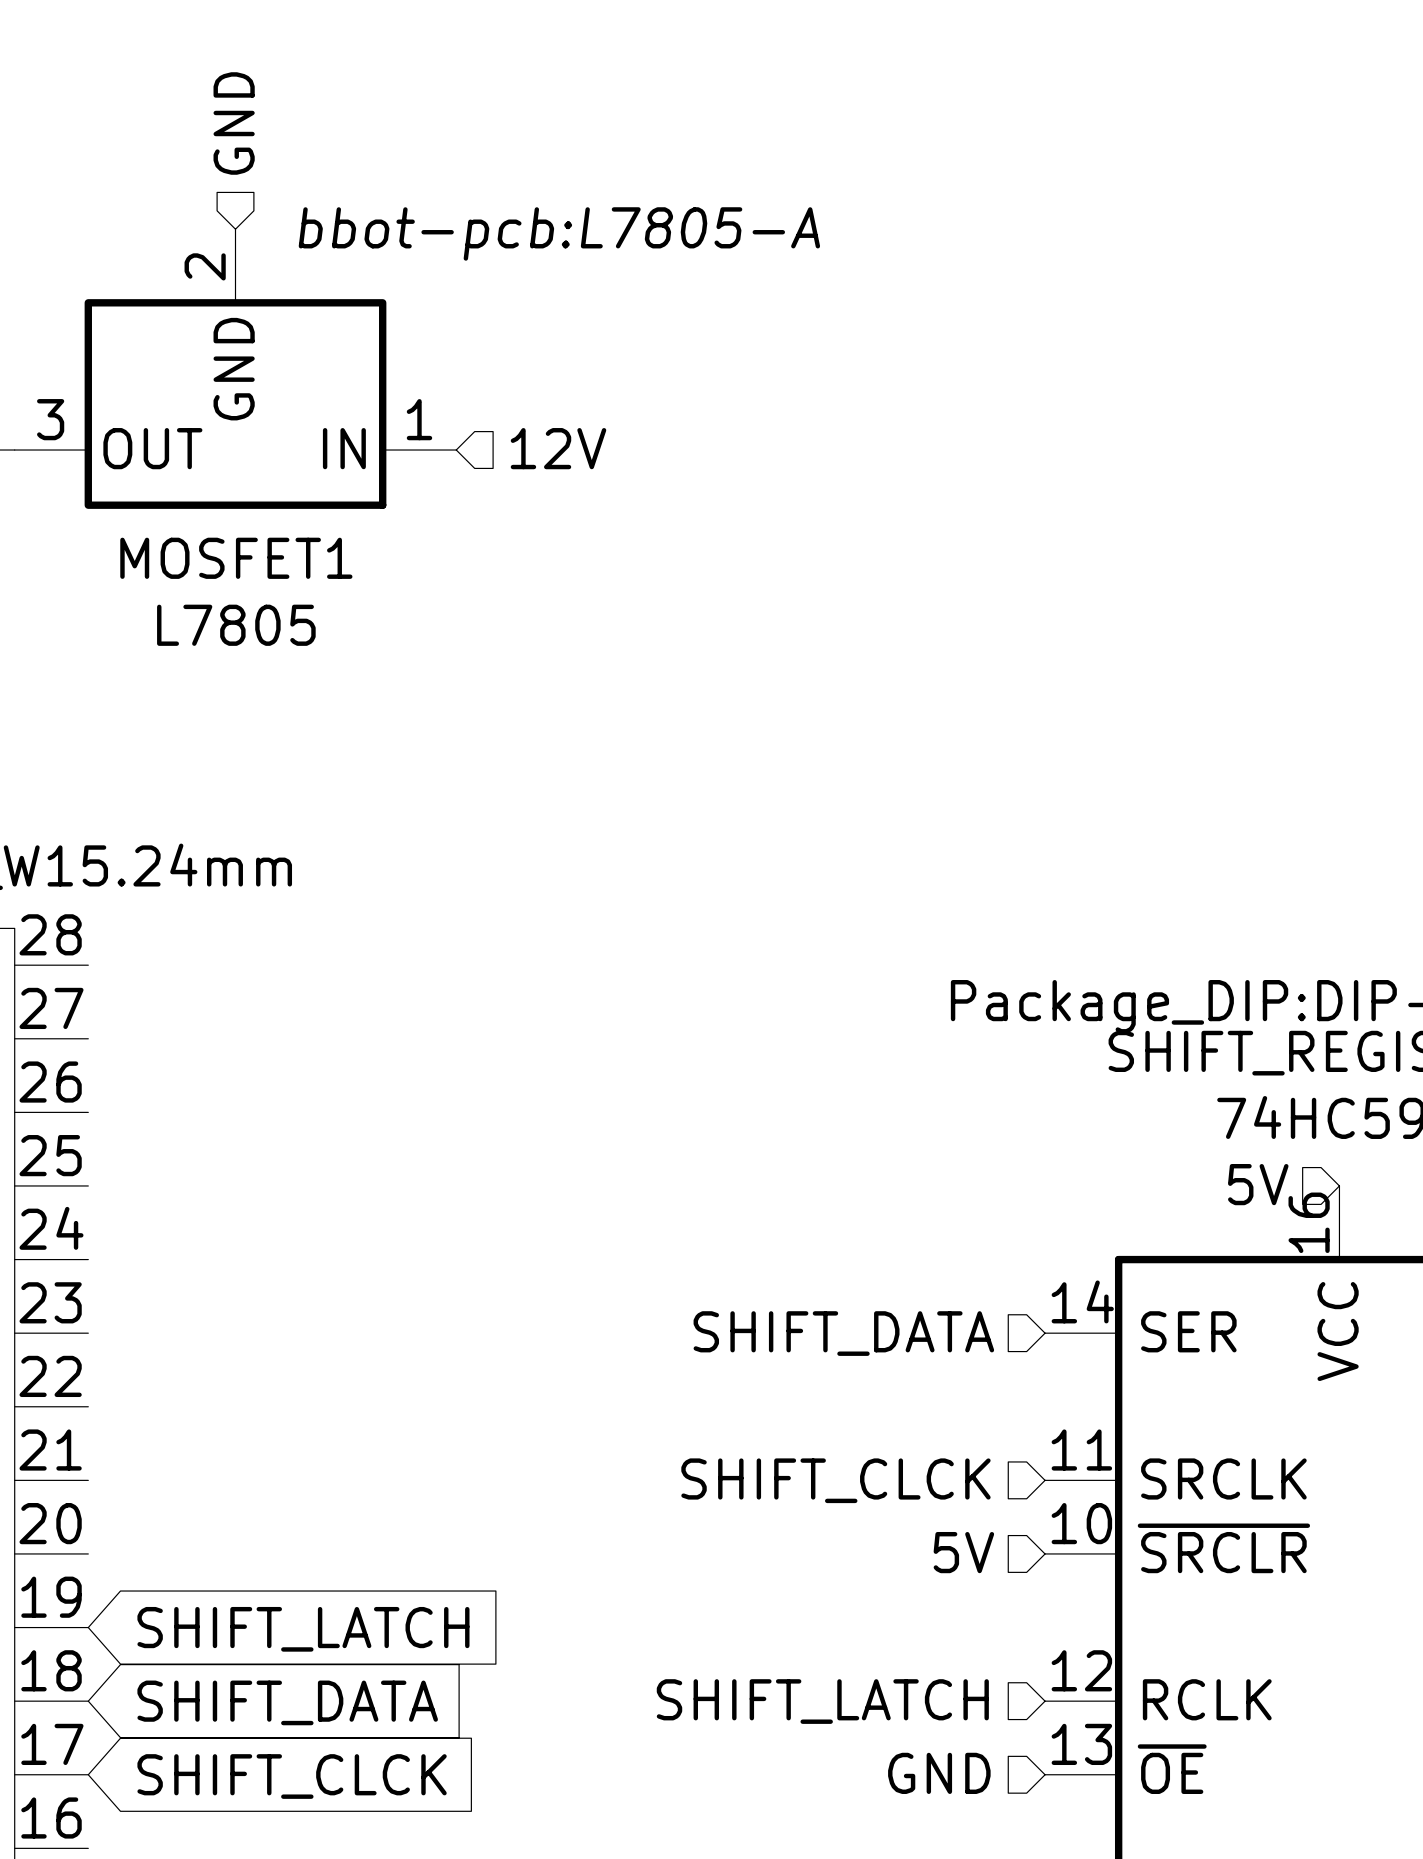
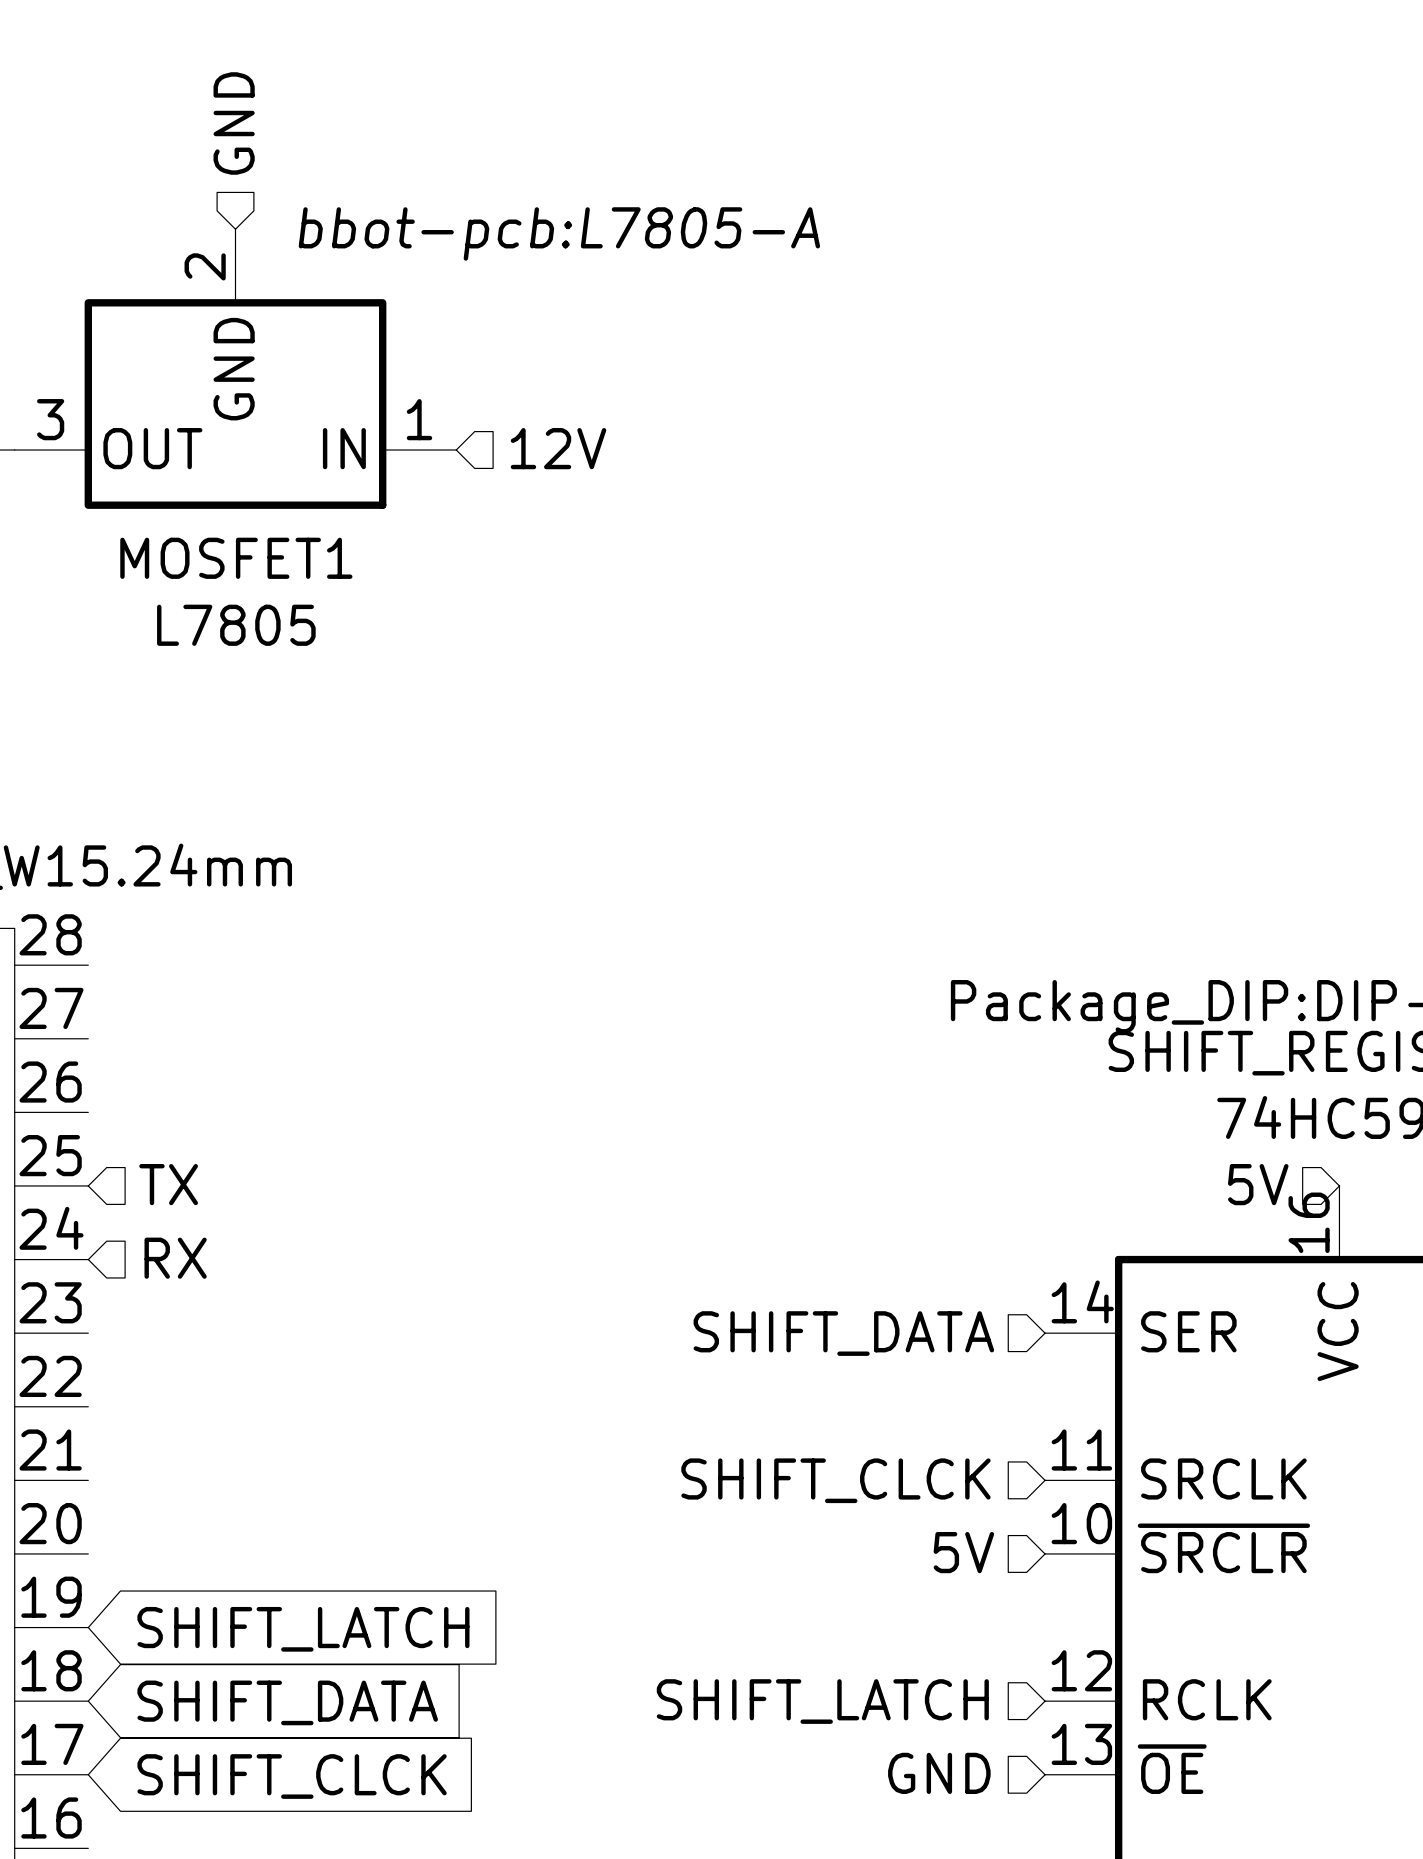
hierarchical label: none -> TX (168, 1184)
hierarchical label: none -> RX (175, 1258)

